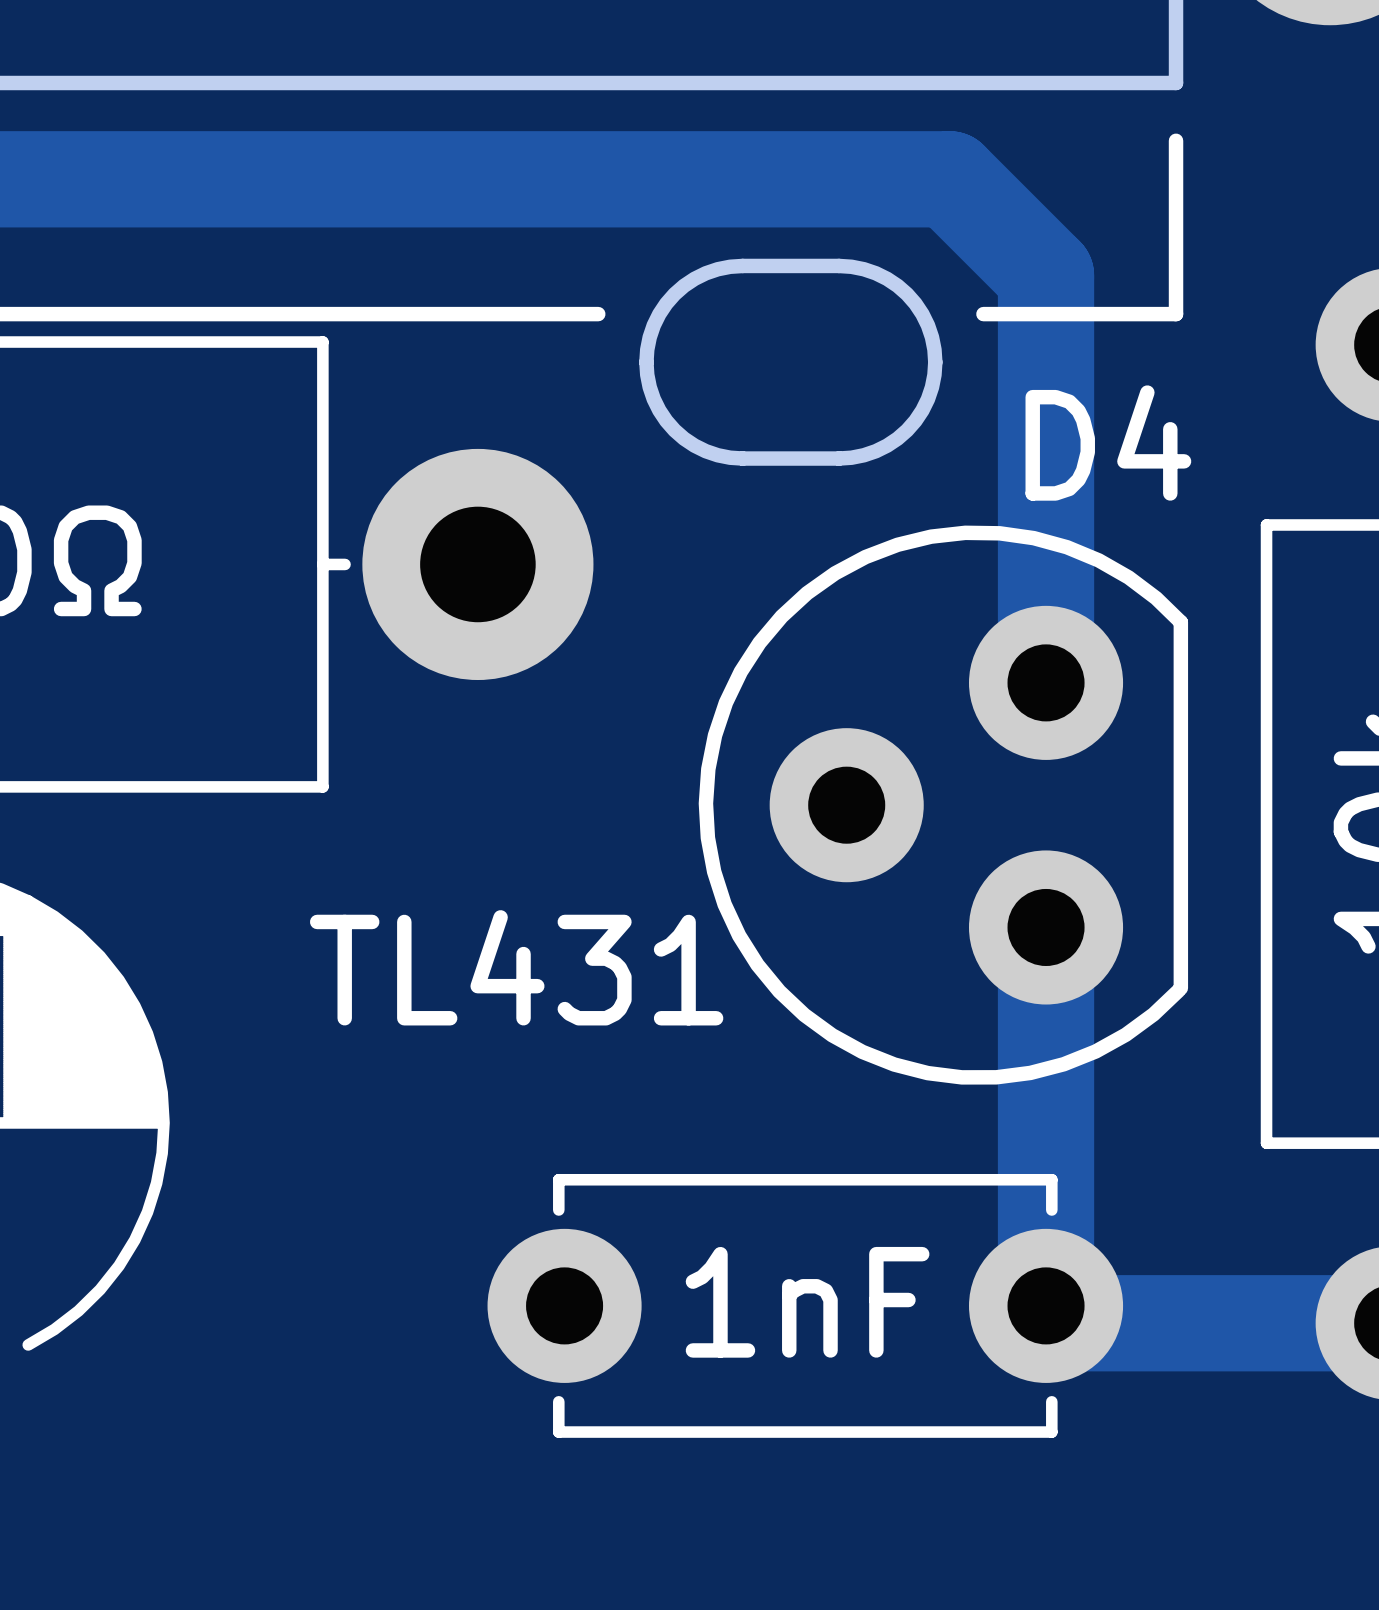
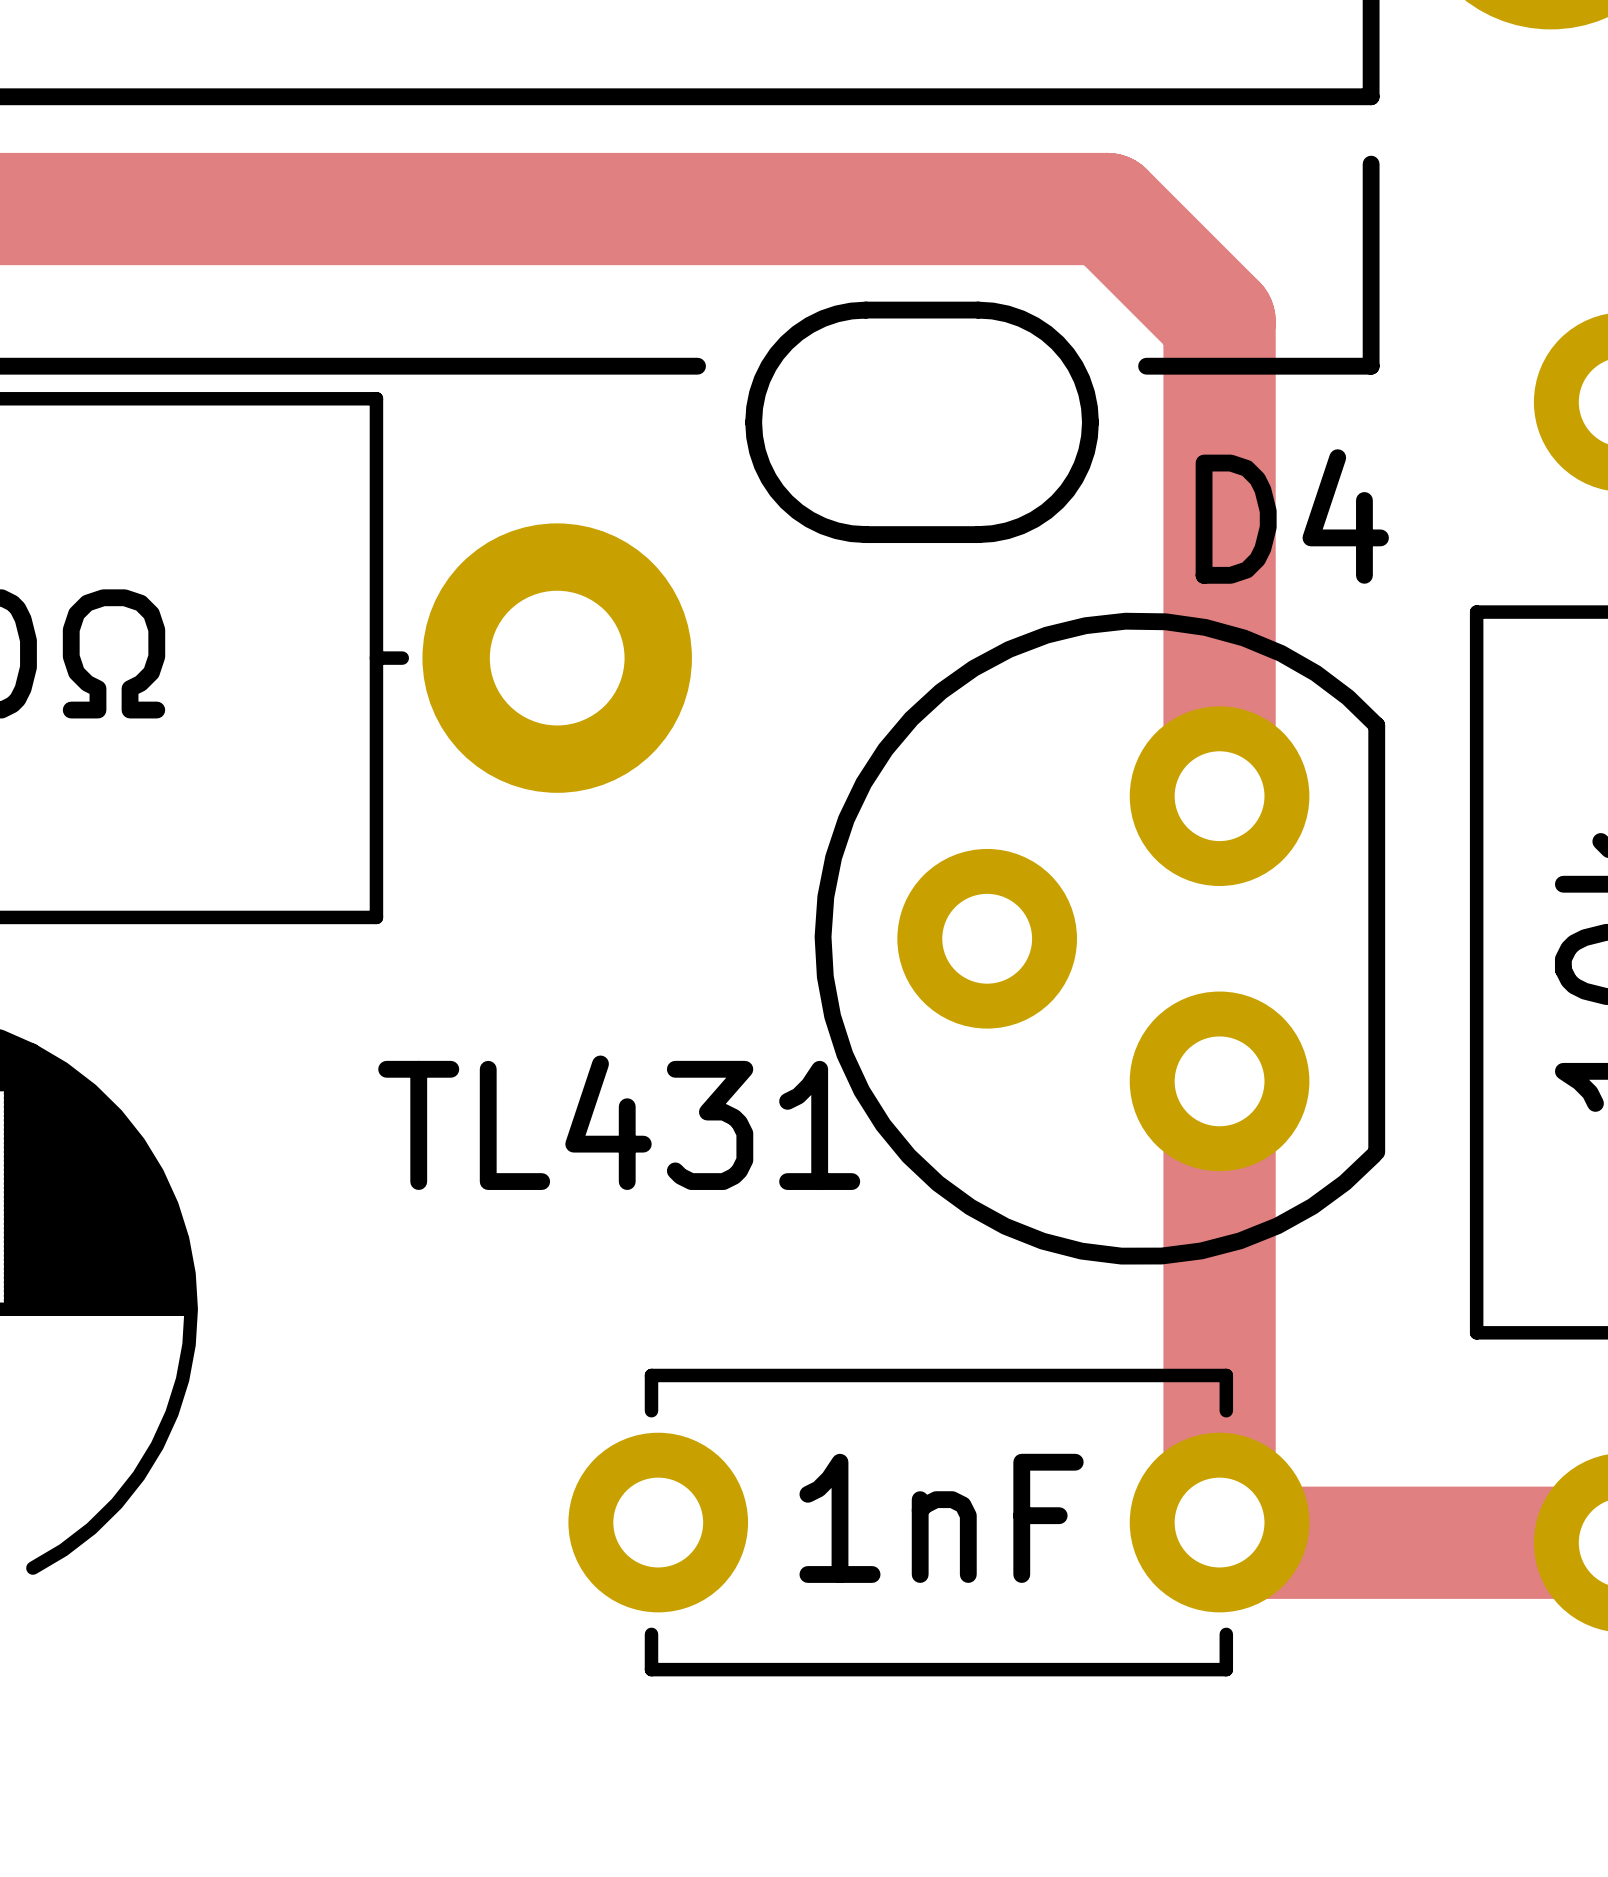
D4 text position: TL431 (516, 967) -> TL431 (619, 1122)

